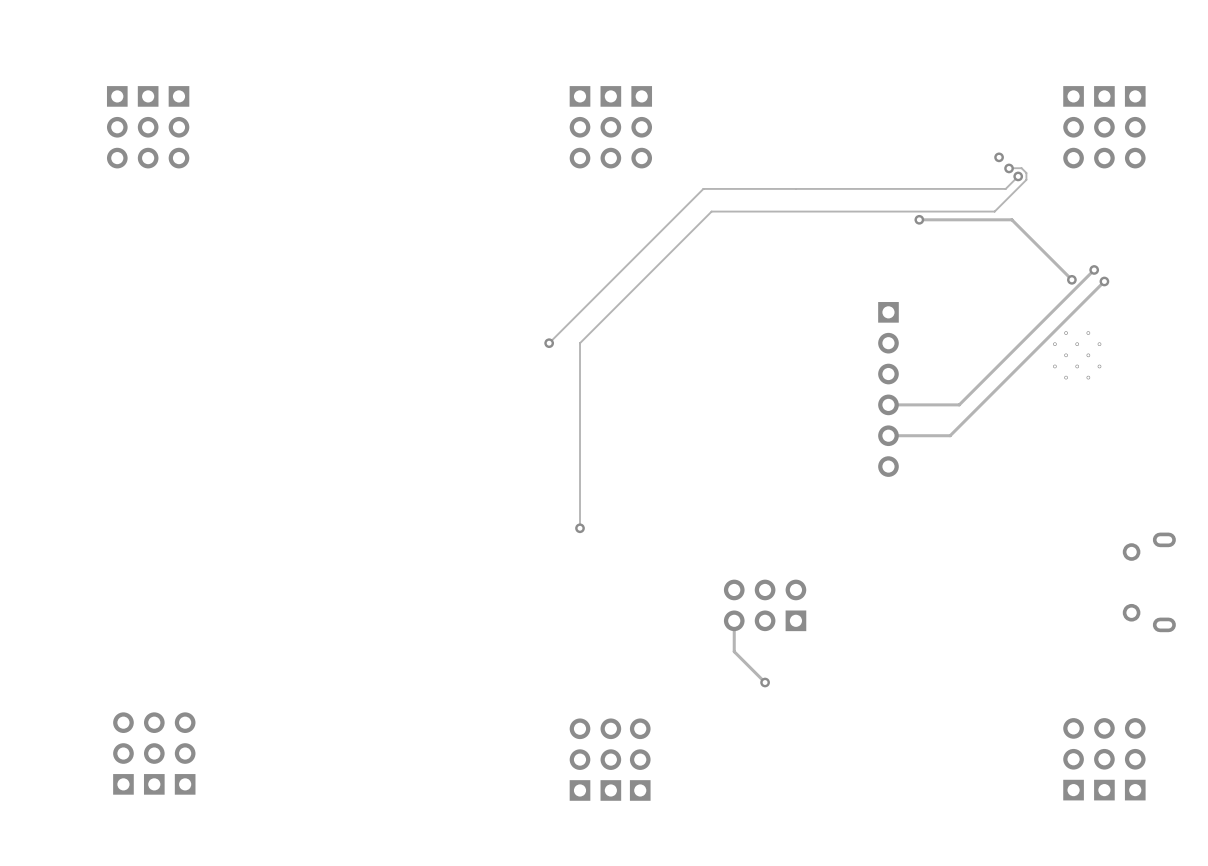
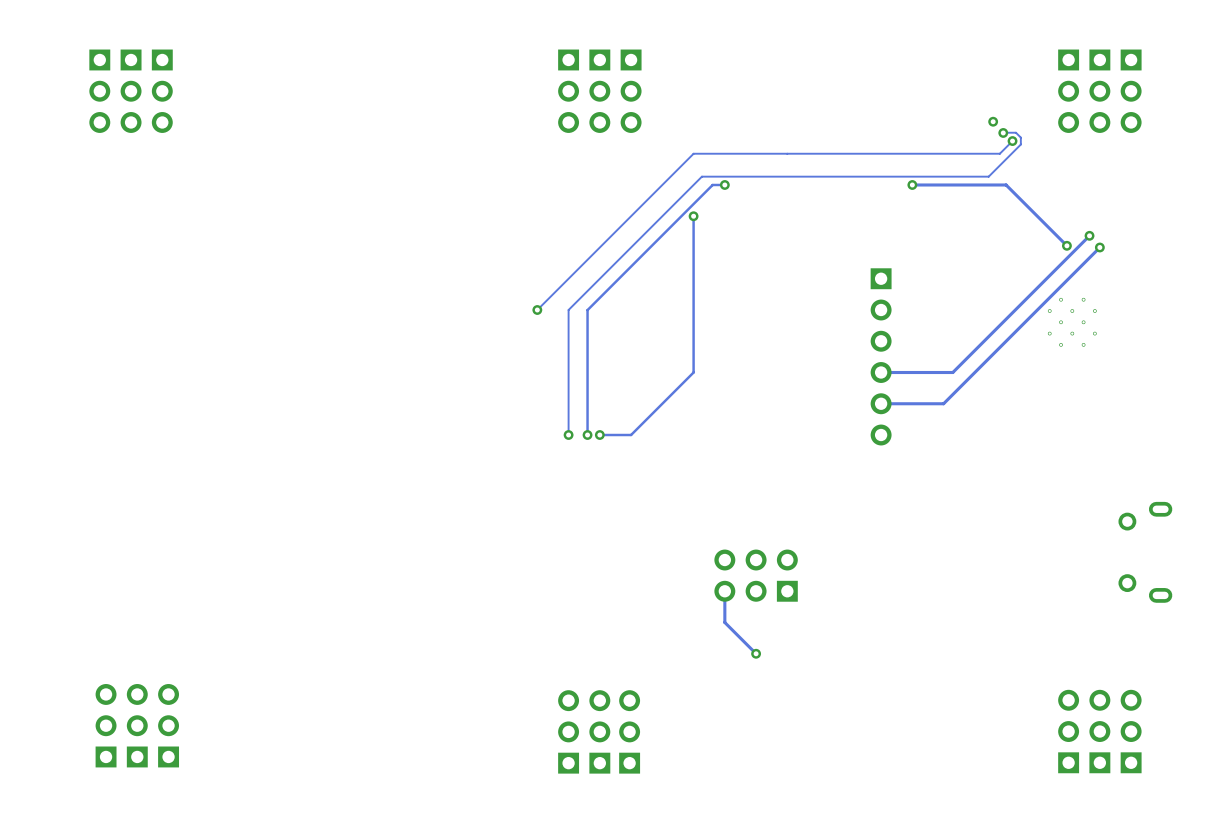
track: none -> (724, 184) (712, 184) (587, 310) (587, 435)
via: none -> (724, 184)
track: none -> (693, 216) (693, 372) (631, 435) (599, 435)
via: none -> (693, 216)
track: (580, 466) (580, 528) -> none
via: none -> (568, 435)
via: none -> (587, 435)
via: none -> (599, 435)
via: (580, 528) -> none

